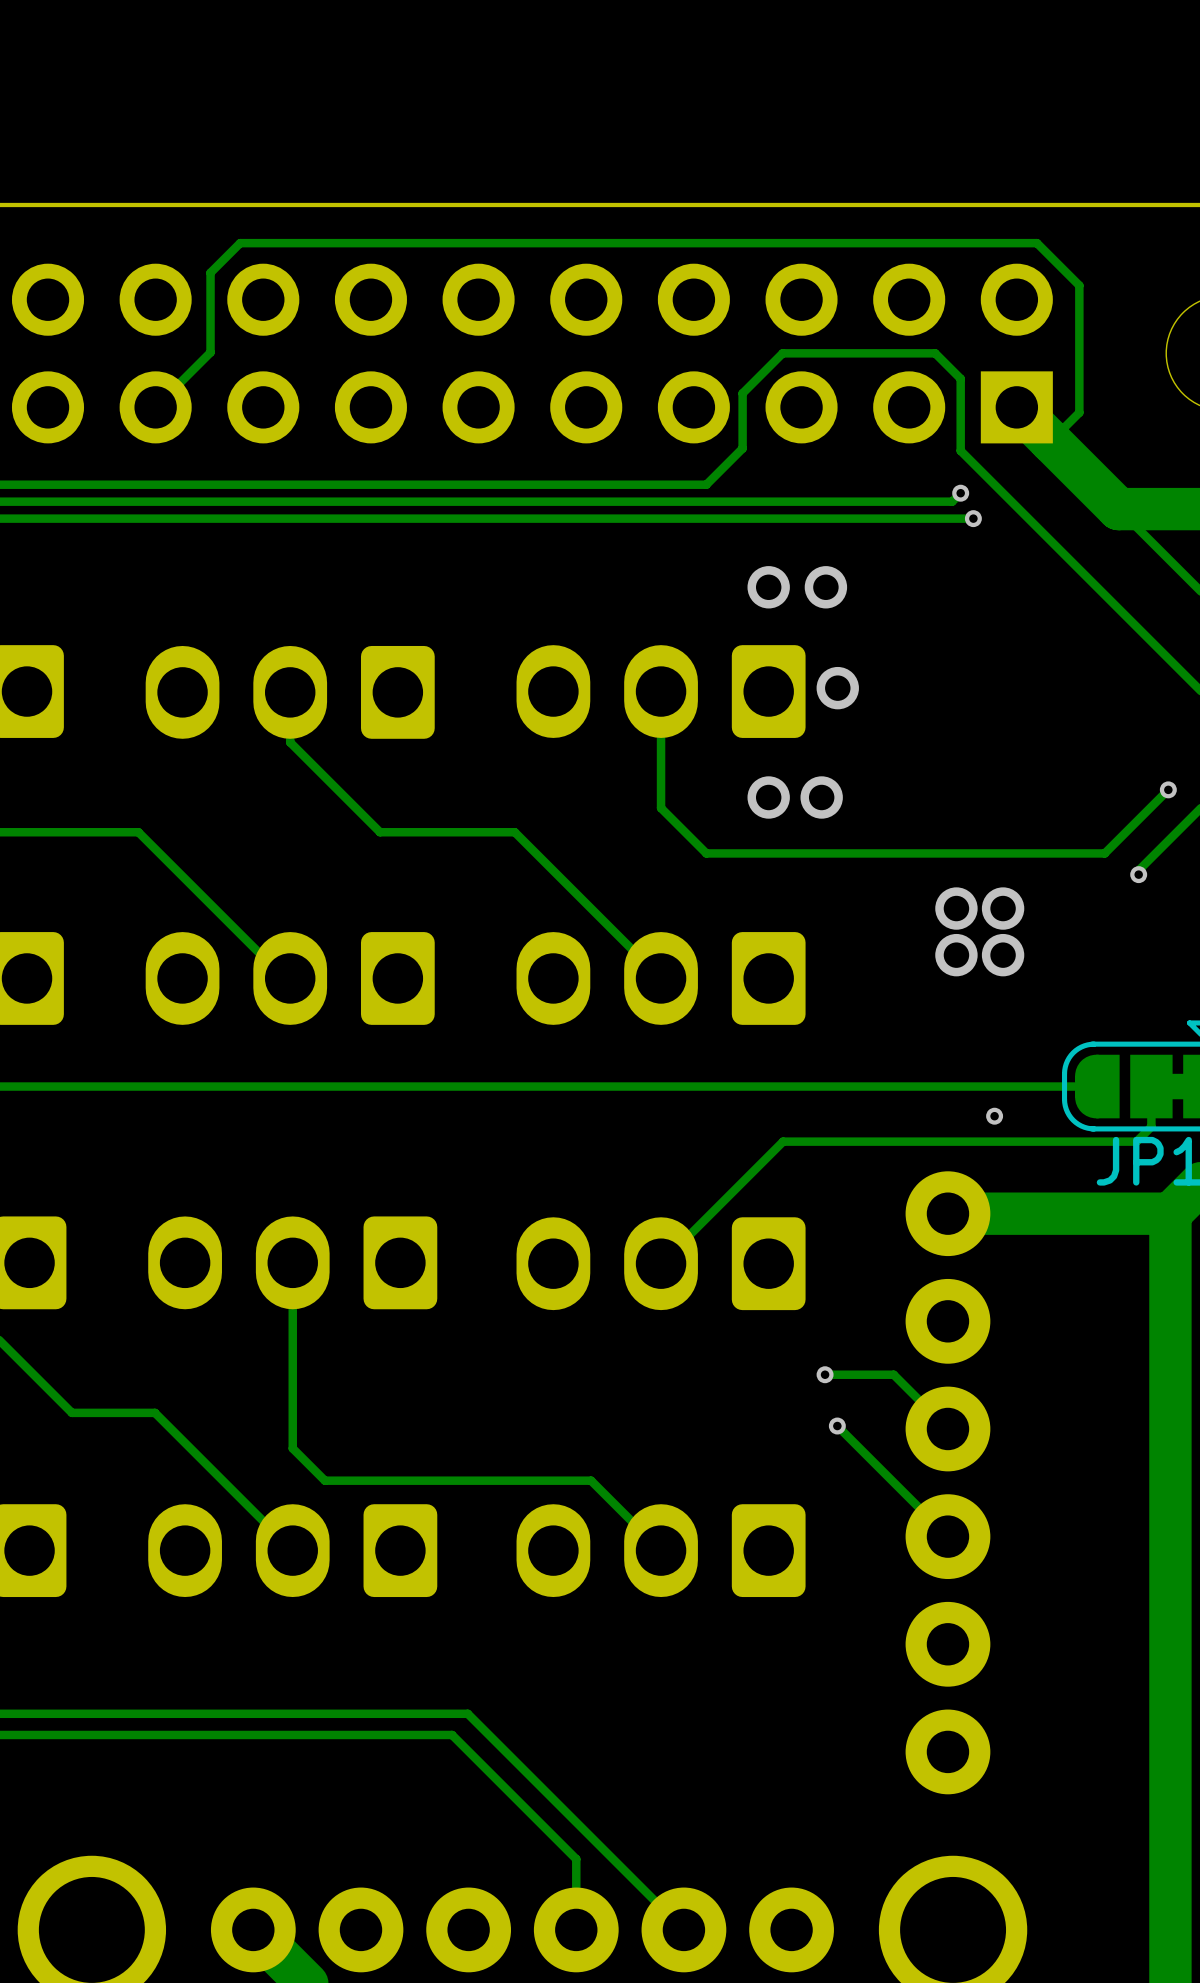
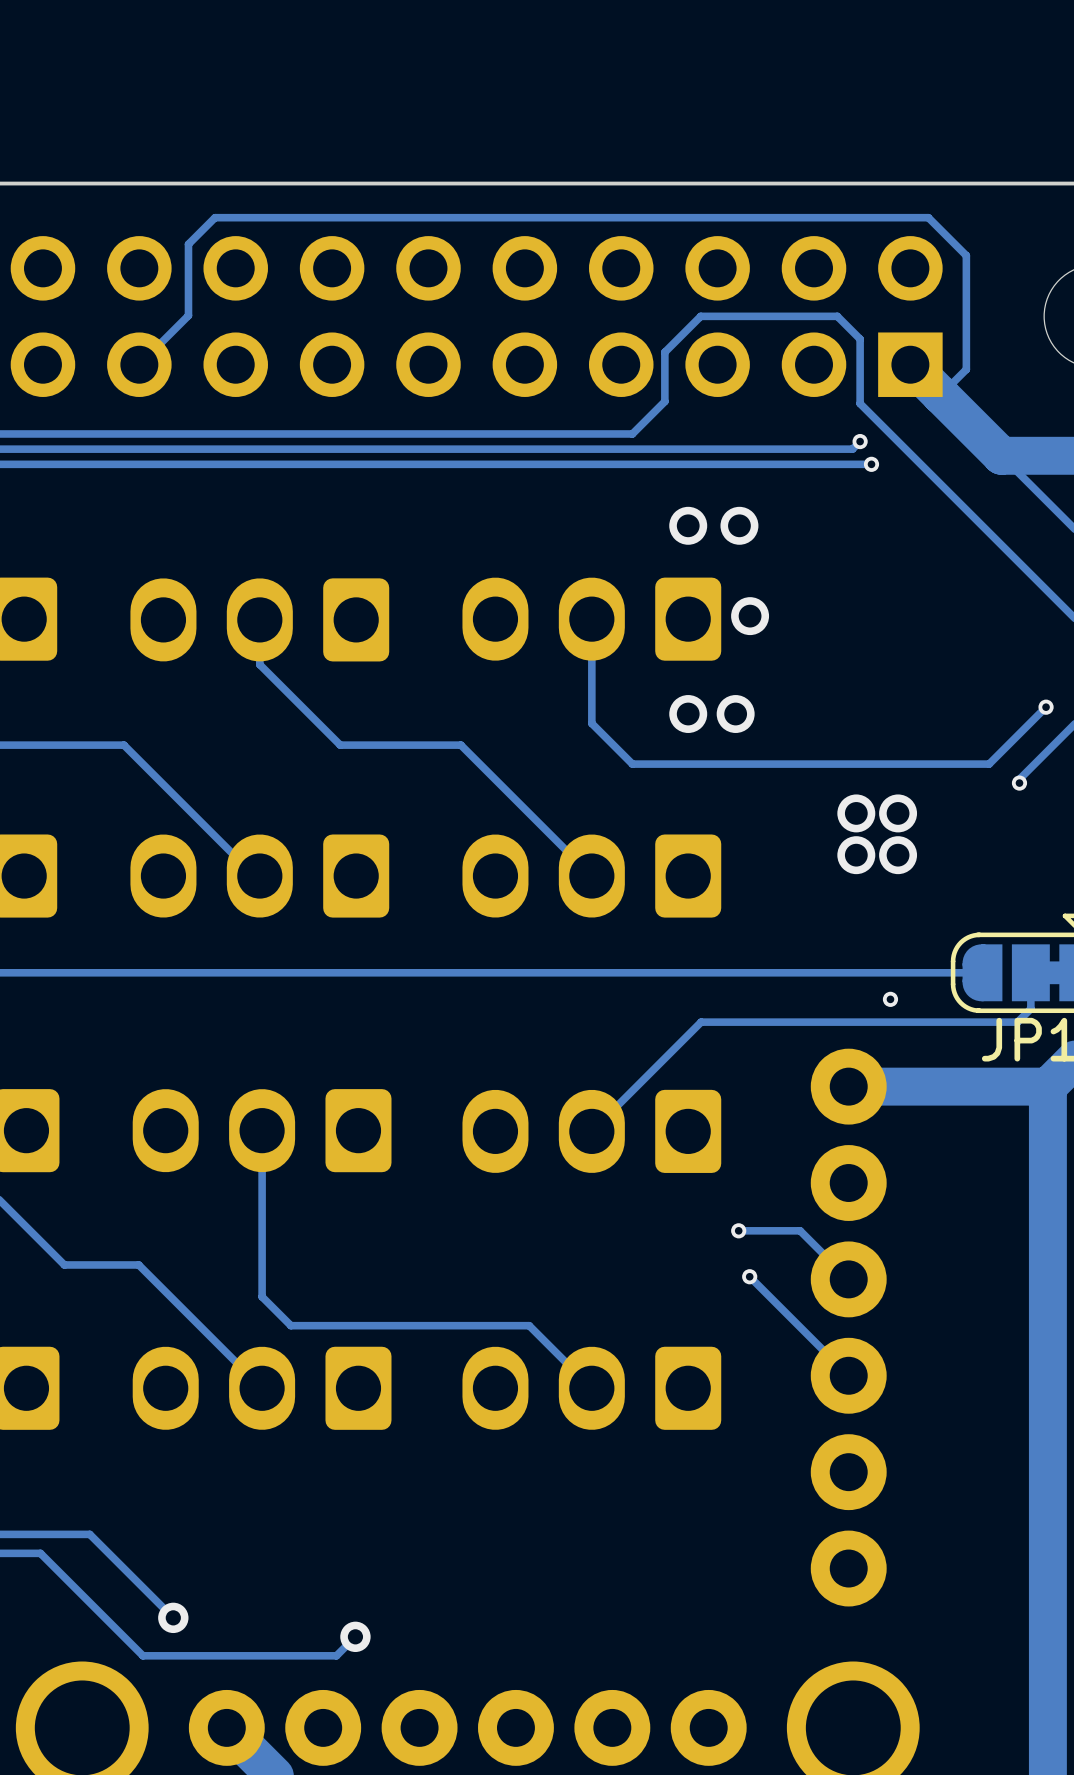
track: (100, 1713) (467, 1713) (683, 1929) -> (89, 1534) (173, 1617)
track: (45, 1734) (452, 1734) (576, 1859) (576, 1929) -> (40, 1553) (142, 1655) (336, 1655) (355, 1636)
via: none -> (173, 1617)
via: none -> (355, 1636)

